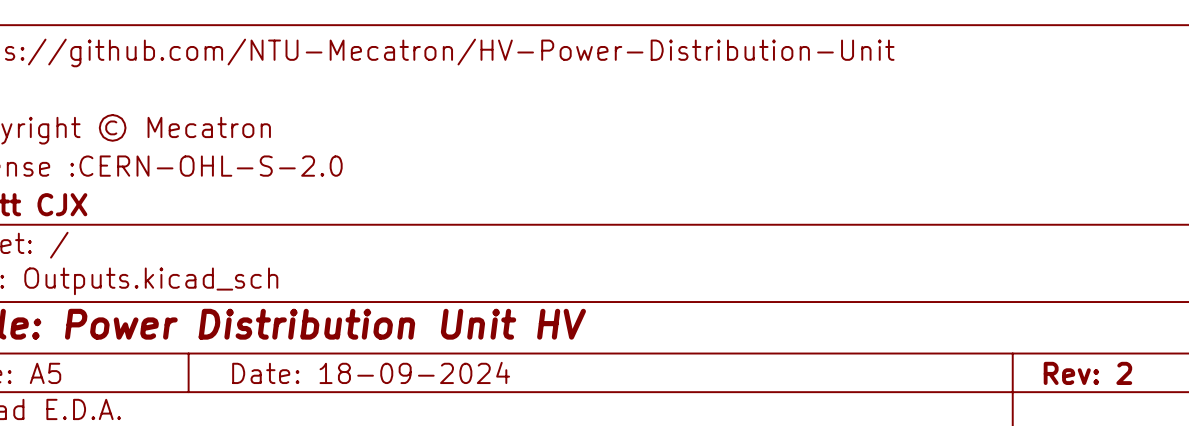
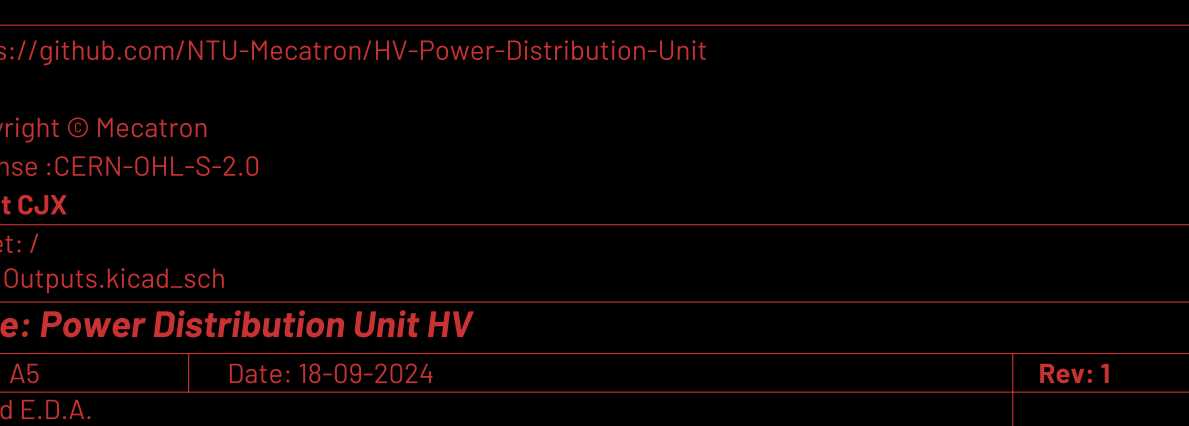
title block: Rev: 2 (1087, 373) -> Rev: 1 (1074, 373)

